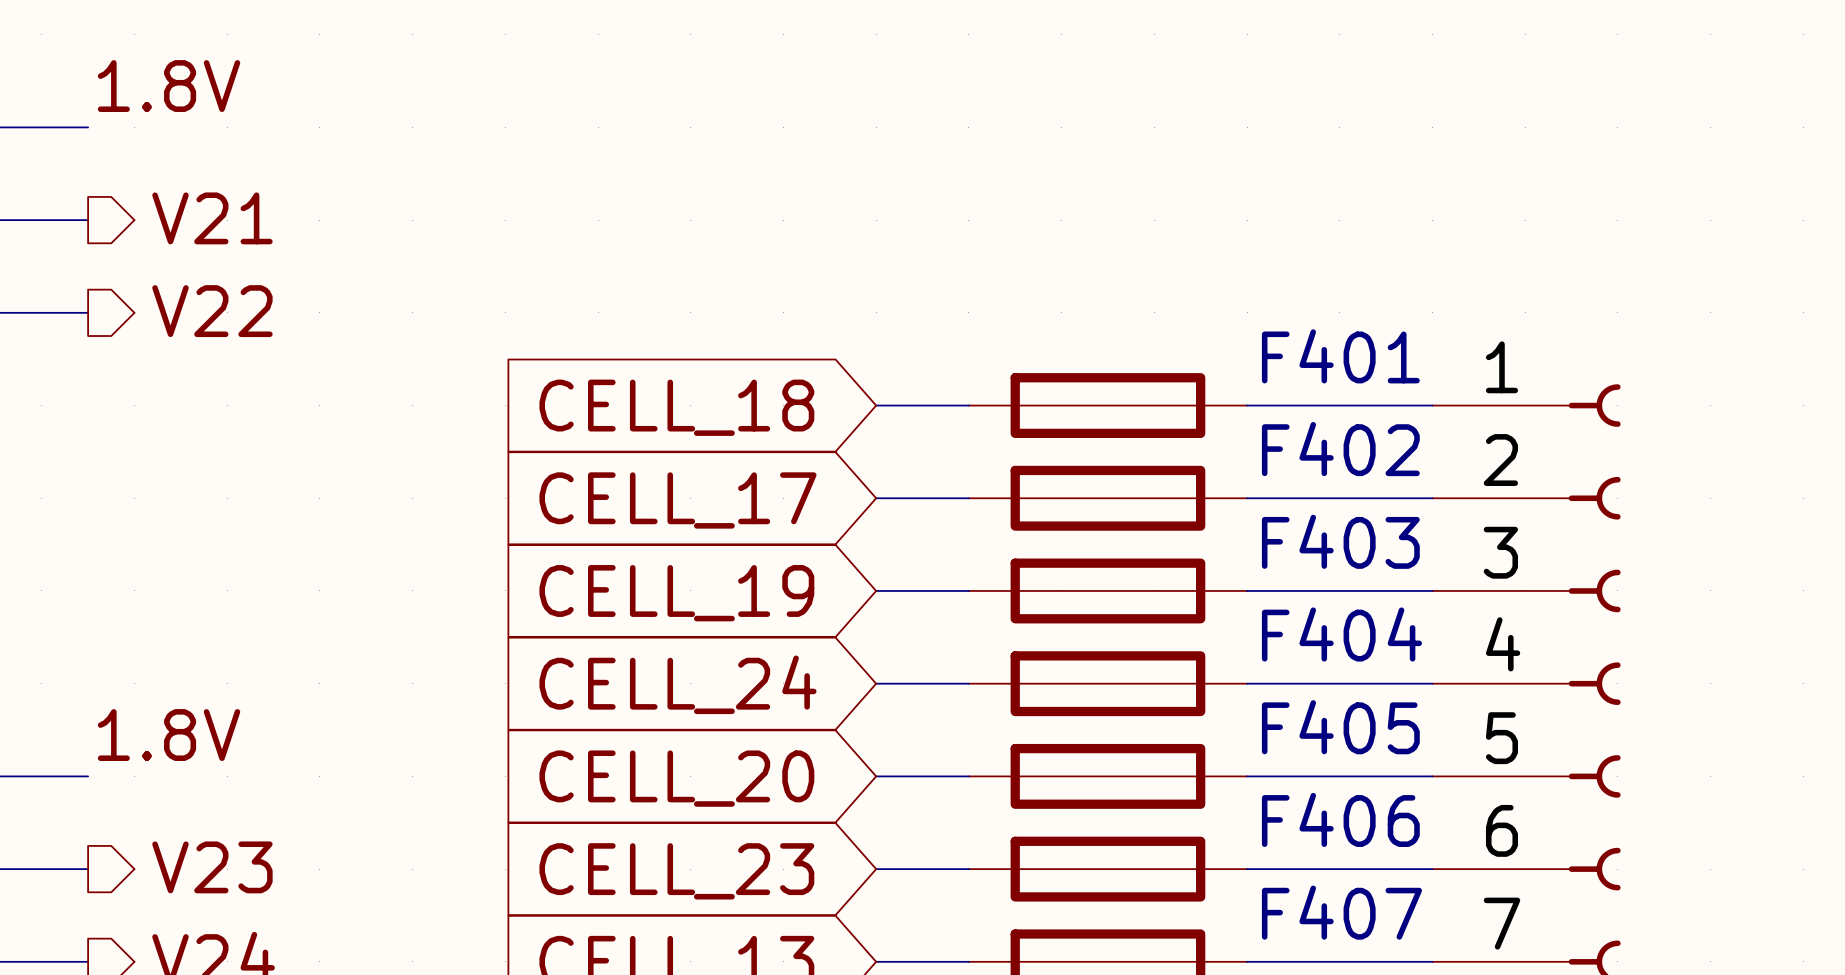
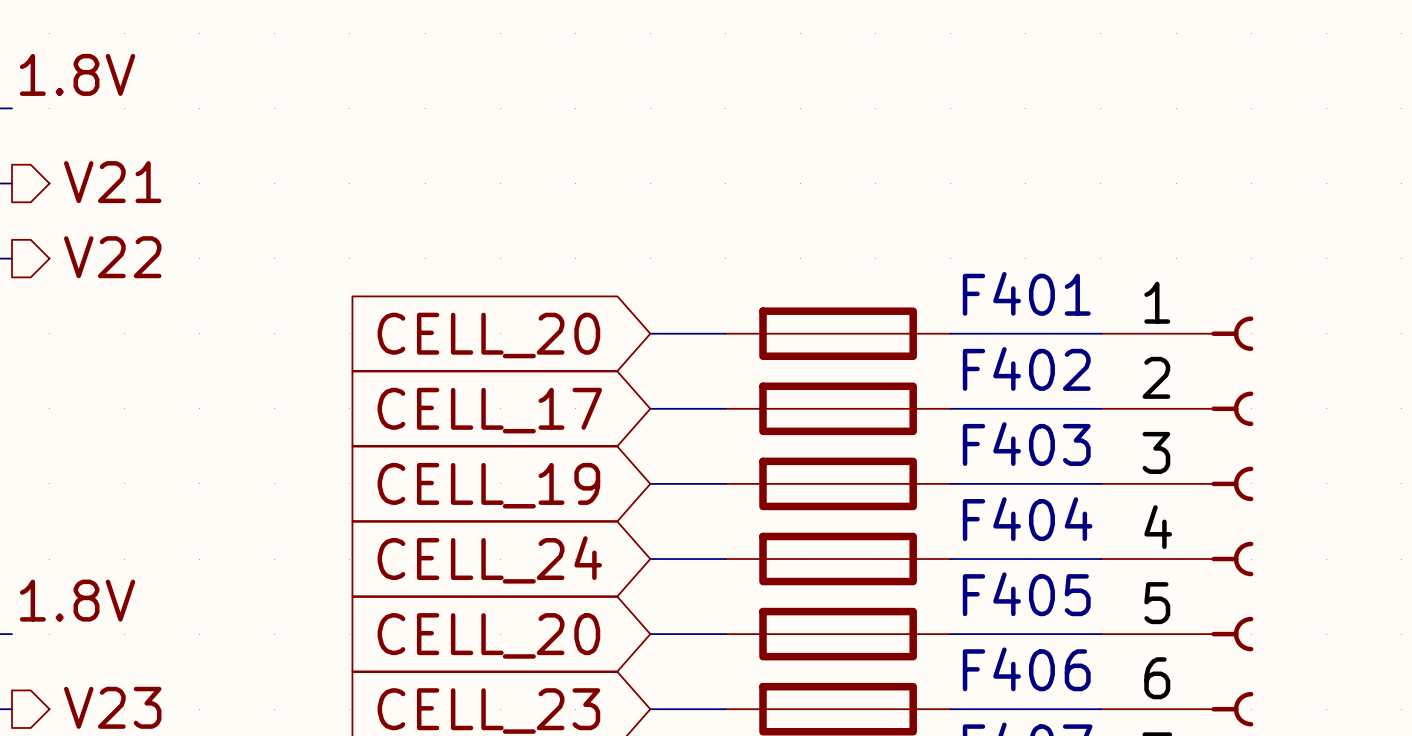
global label: CELL_18 (676, 407) -> CELL_20 (488, 335)

